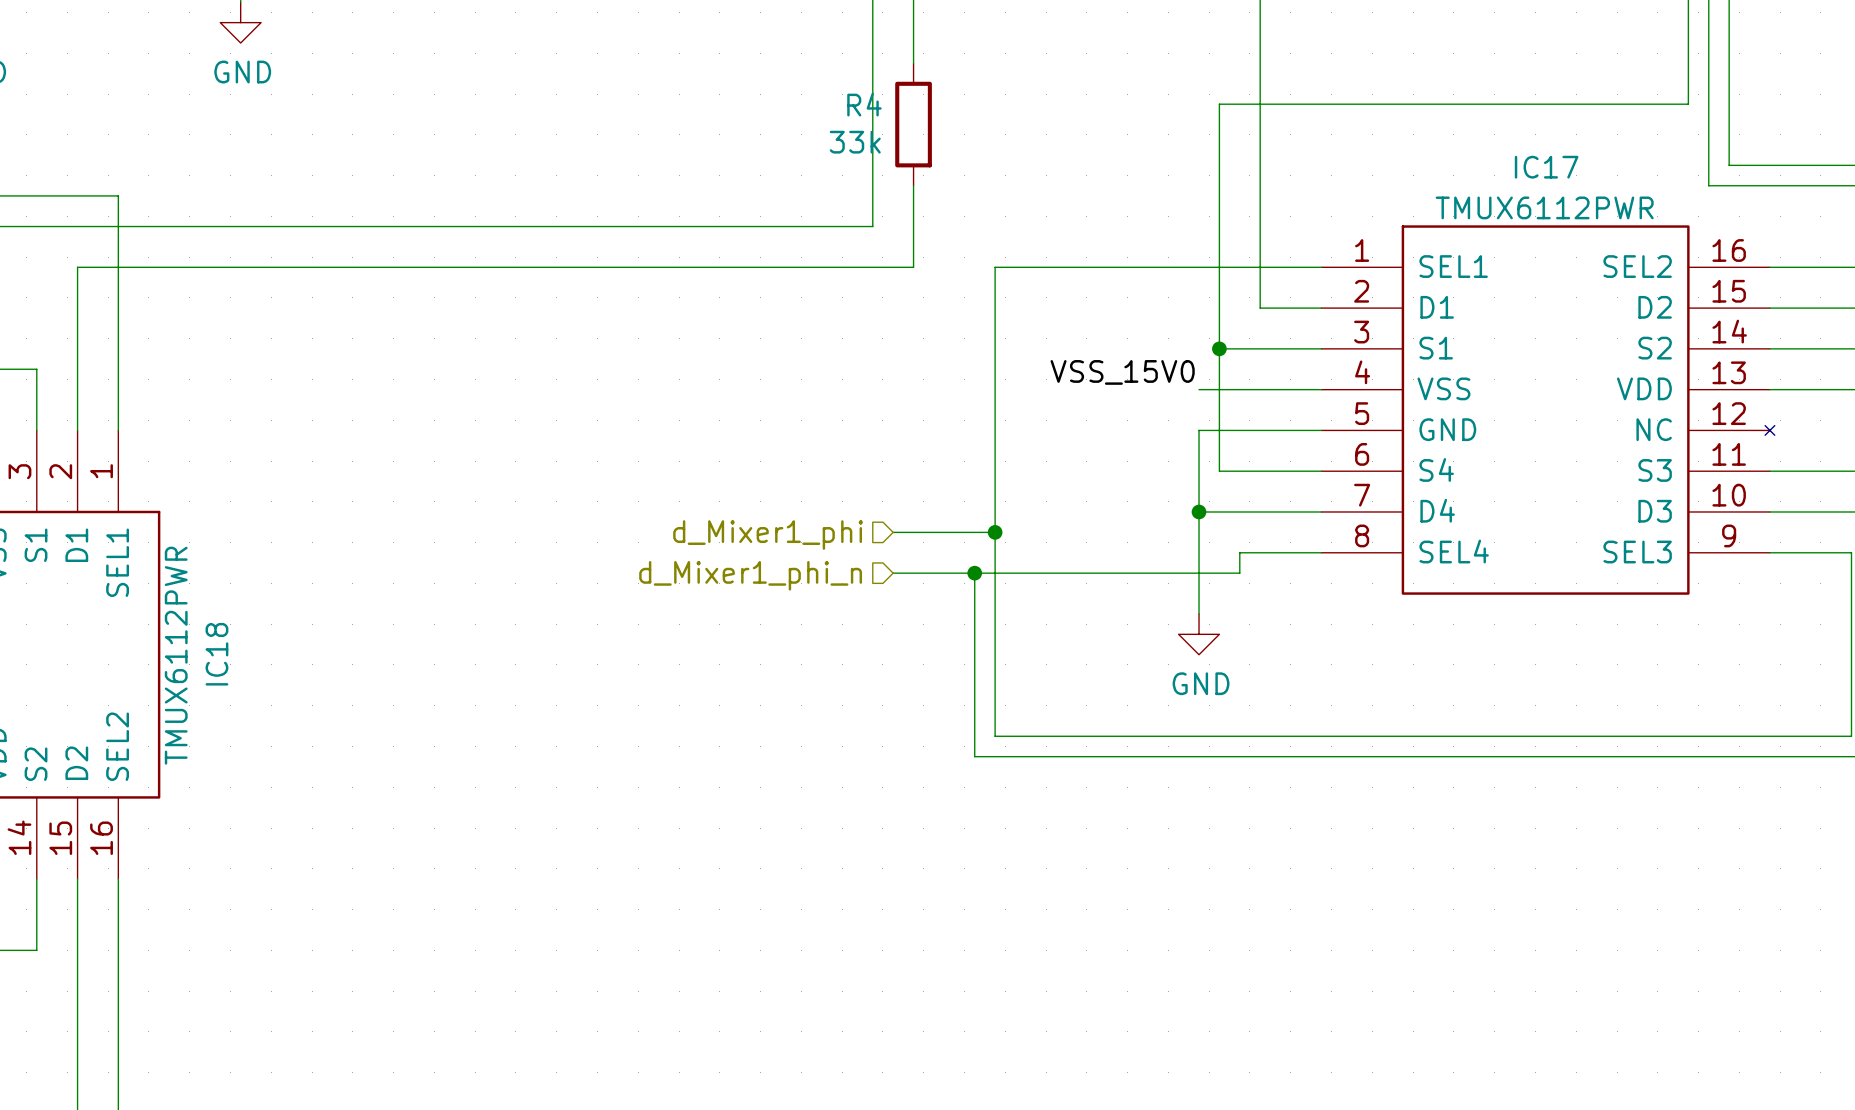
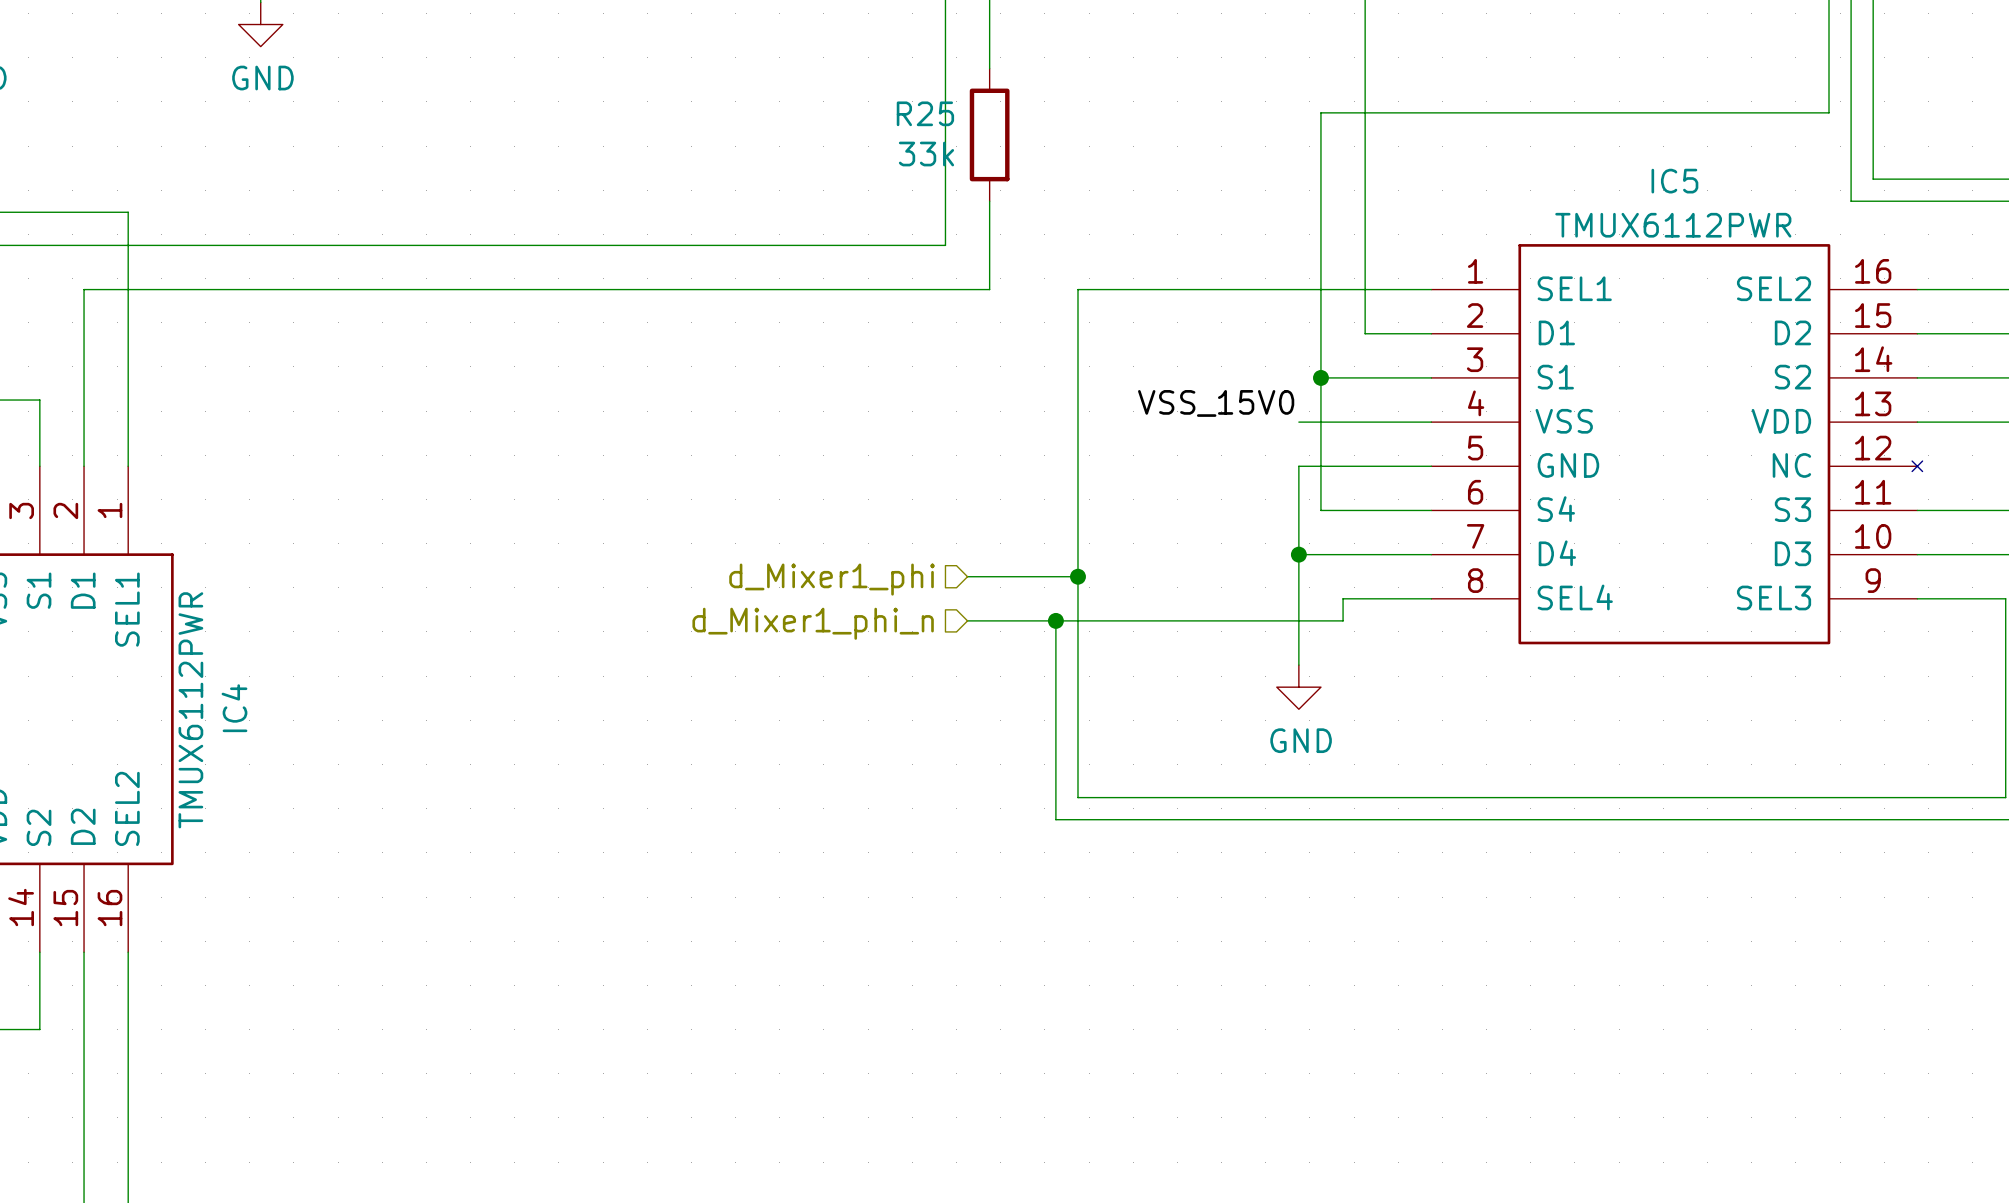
R4 name: R4 (864, 104) -> R25 (925, 113)
IC17 name: IC17 (1546, 167) -> IC5 (1674, 181)
IC18 name: IC18 (216, 654) -> IC4 (234, 708)

